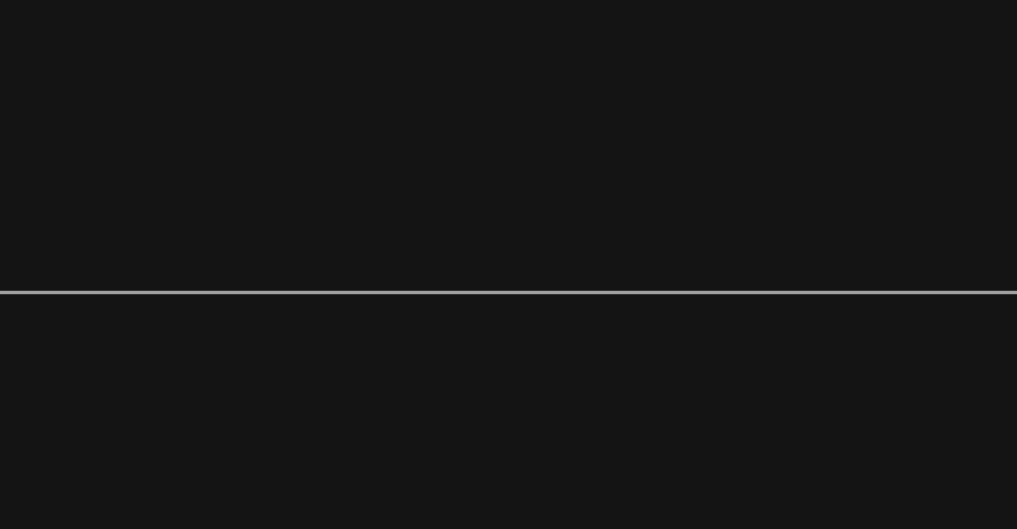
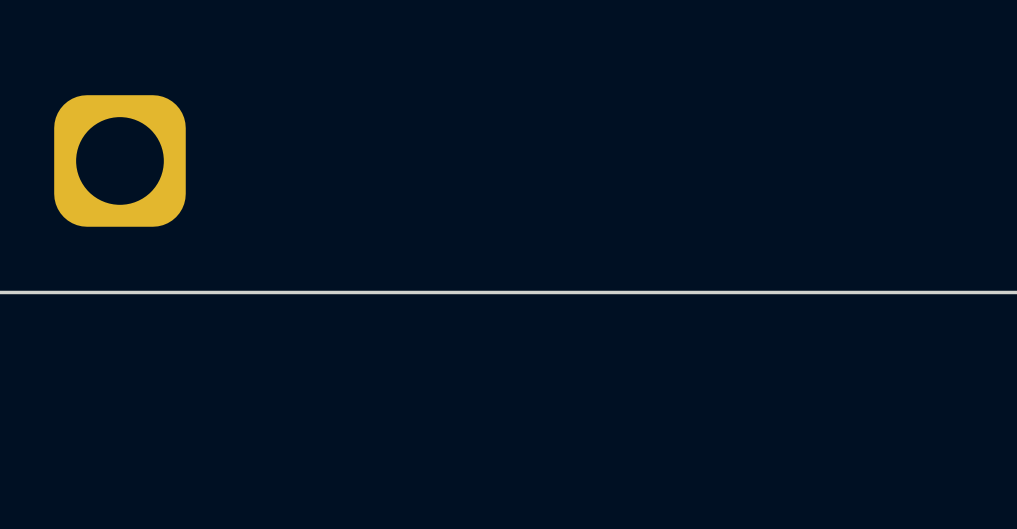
part: none -> (119, 160)

